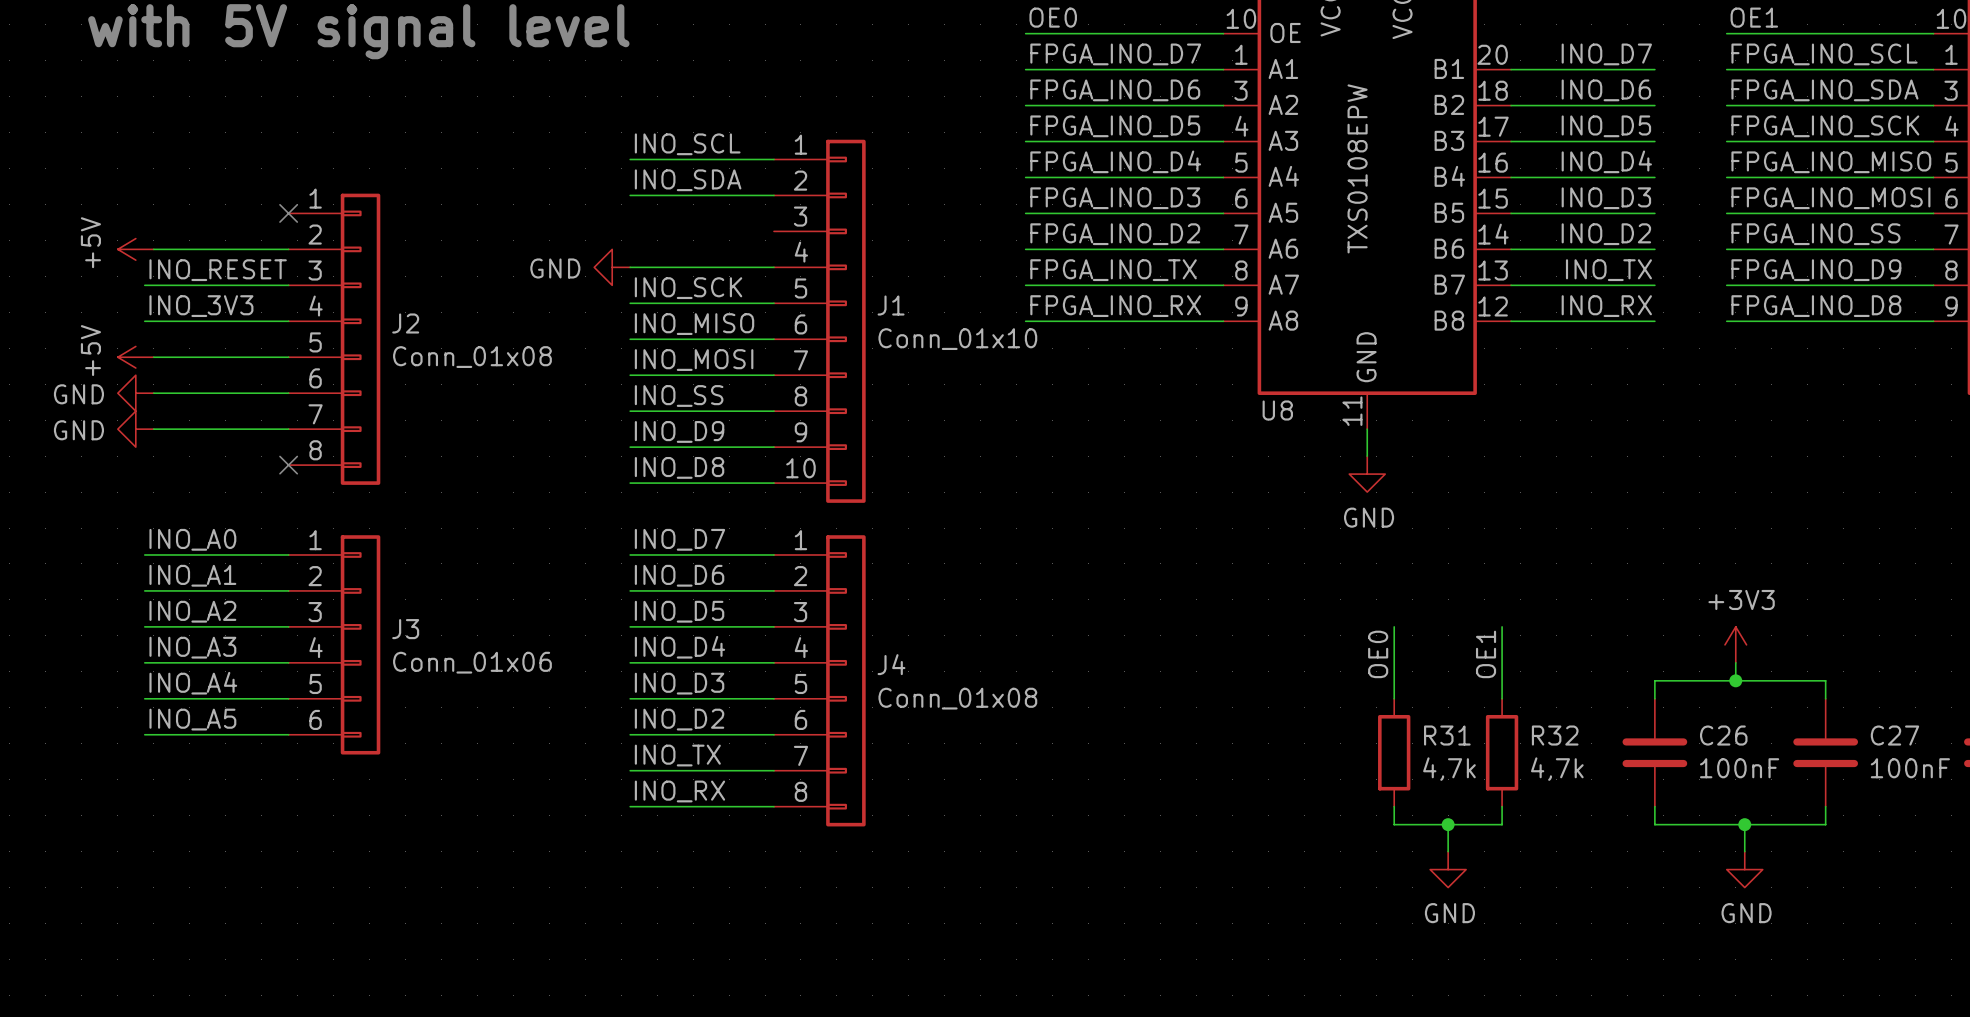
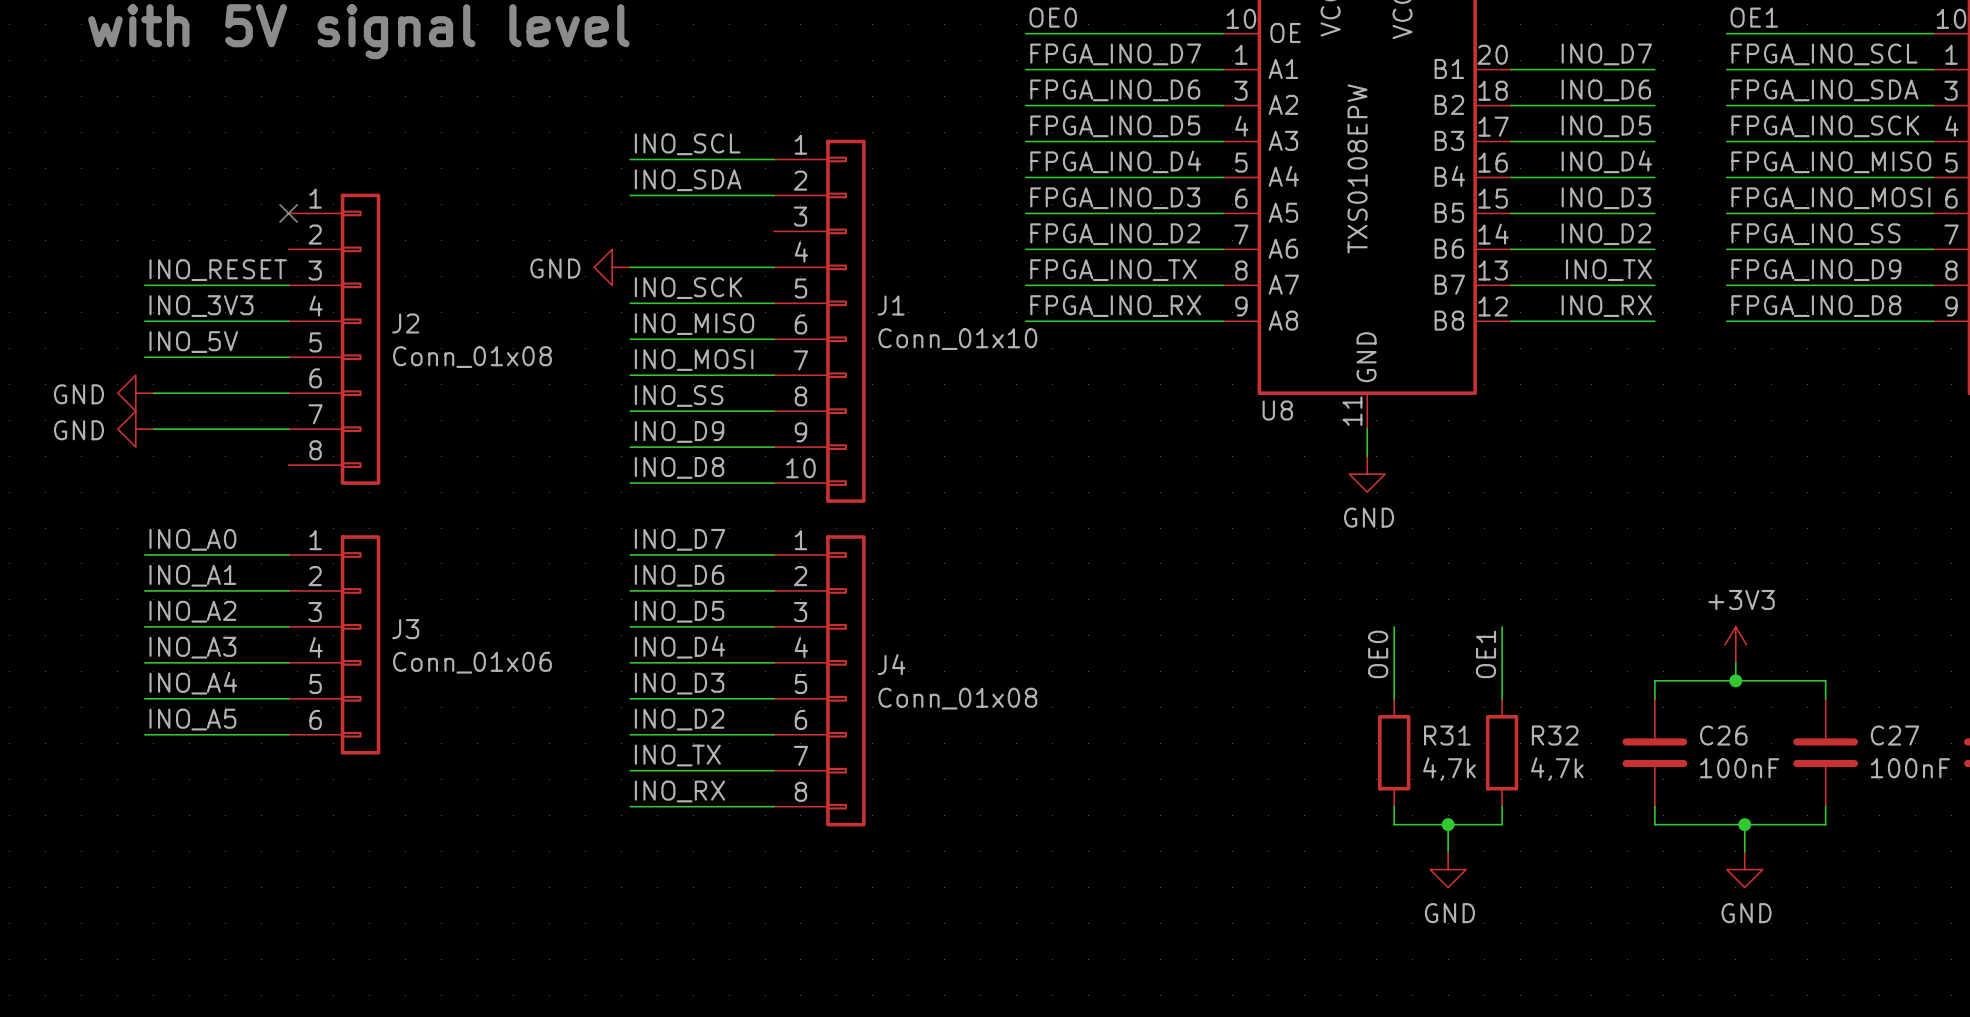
power symbol: +5V (135, 249) -> none
wire: (153, 249) (288, 249) -> none
label: none -> INO_5V (193, 342)
power symbol: +5V (135, 357) -> none
no-connect mark: (288, 465) -> none

